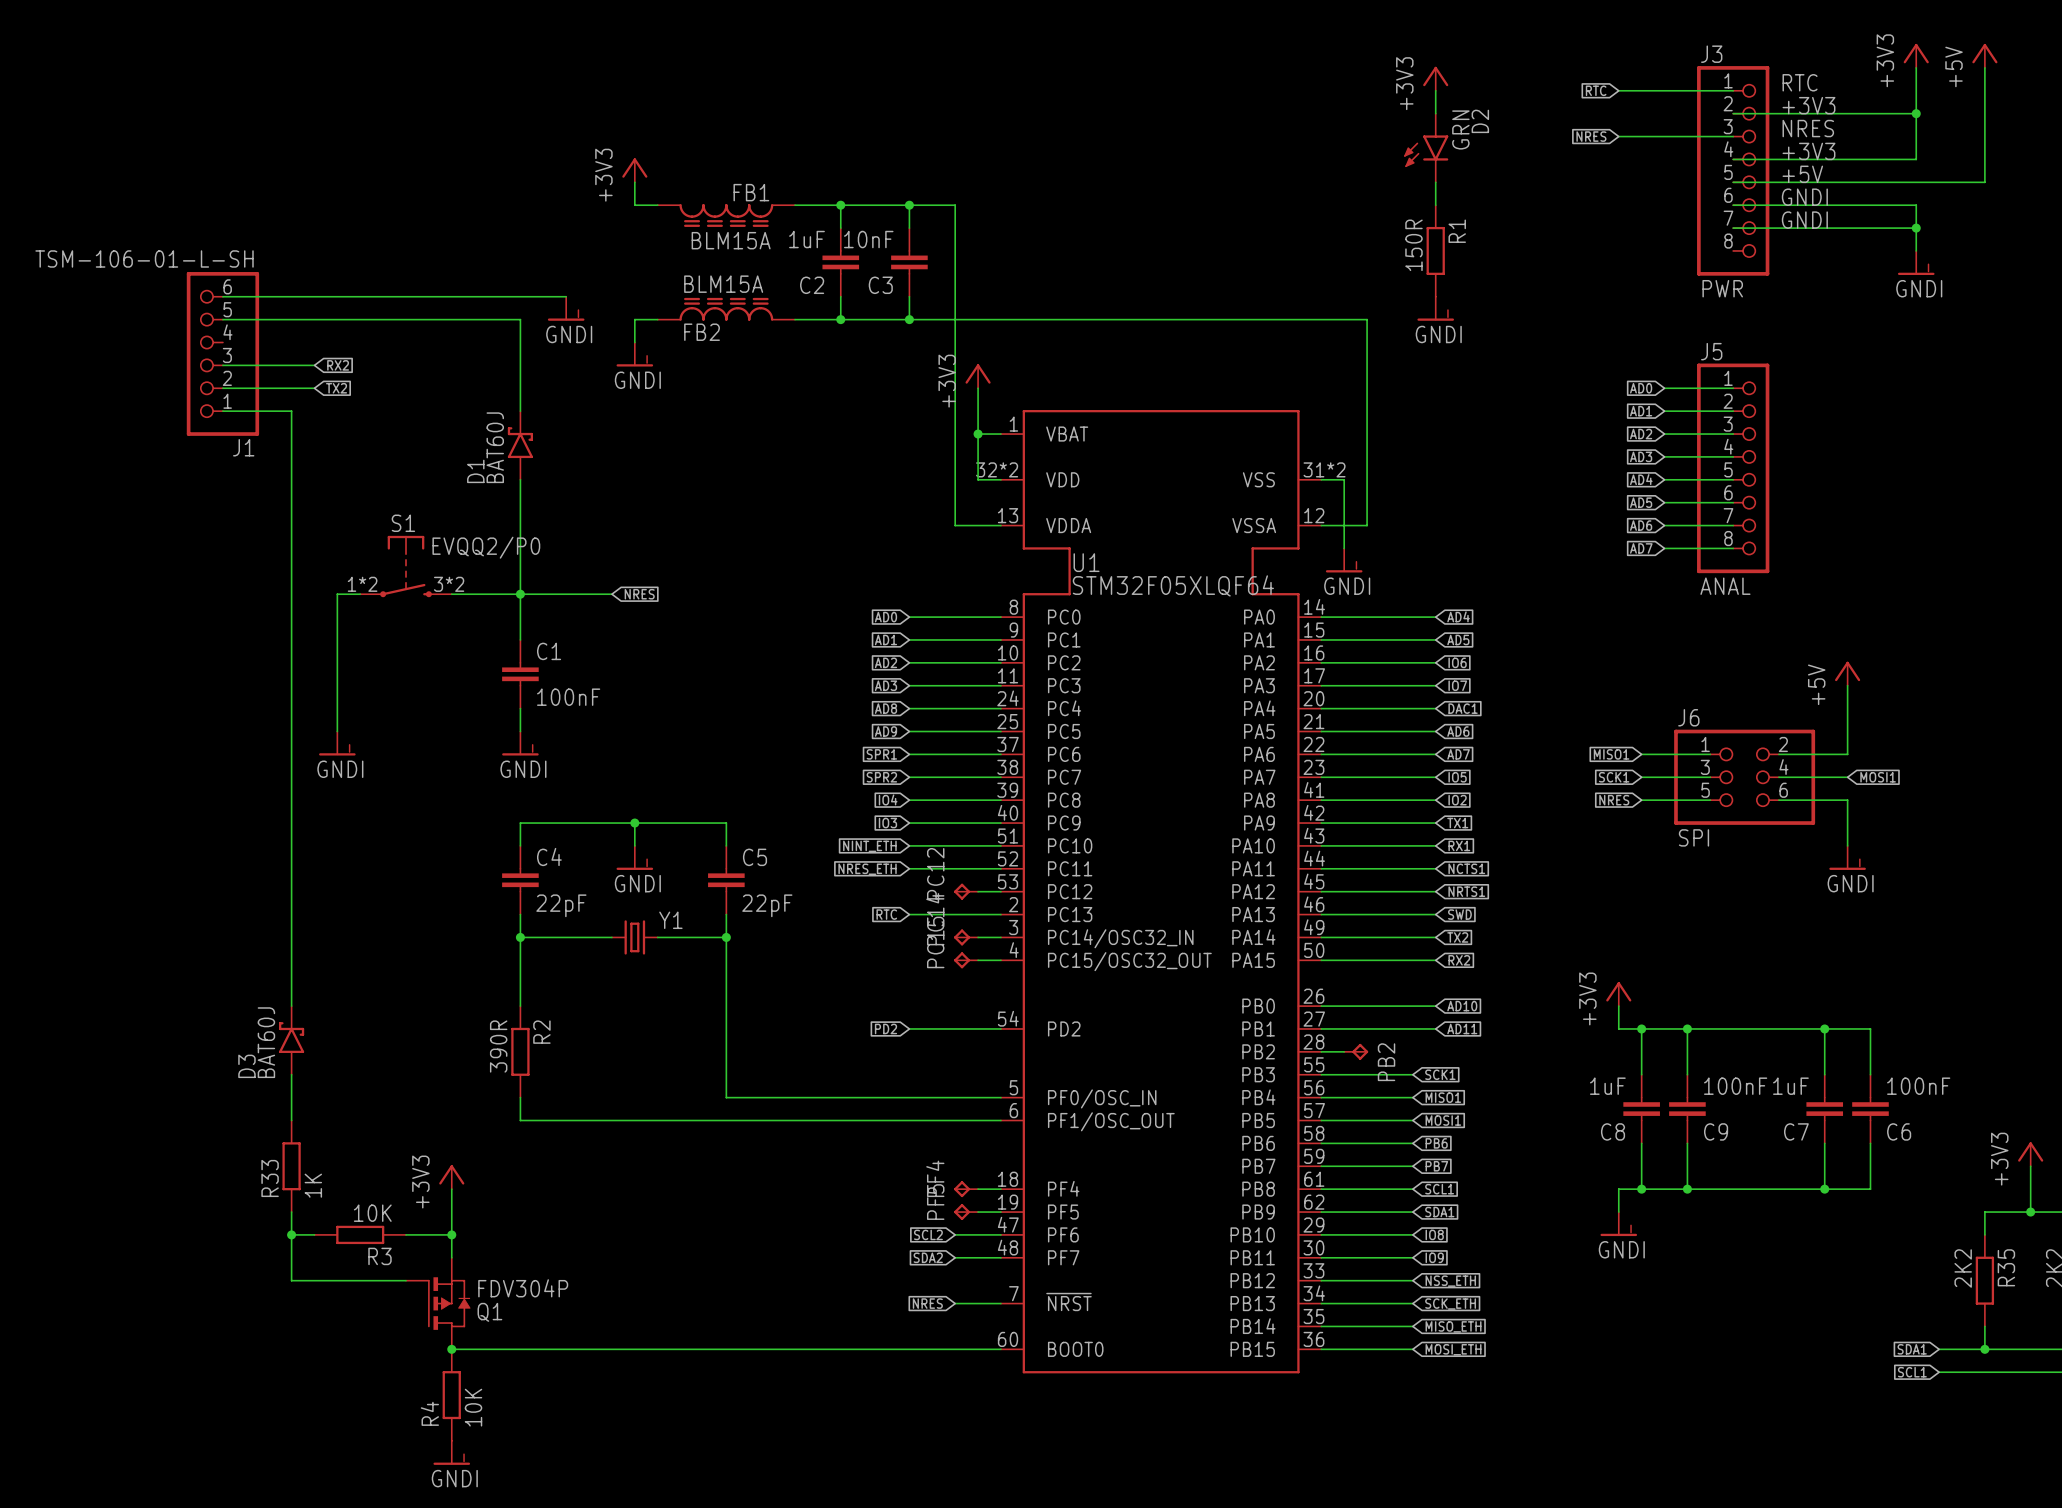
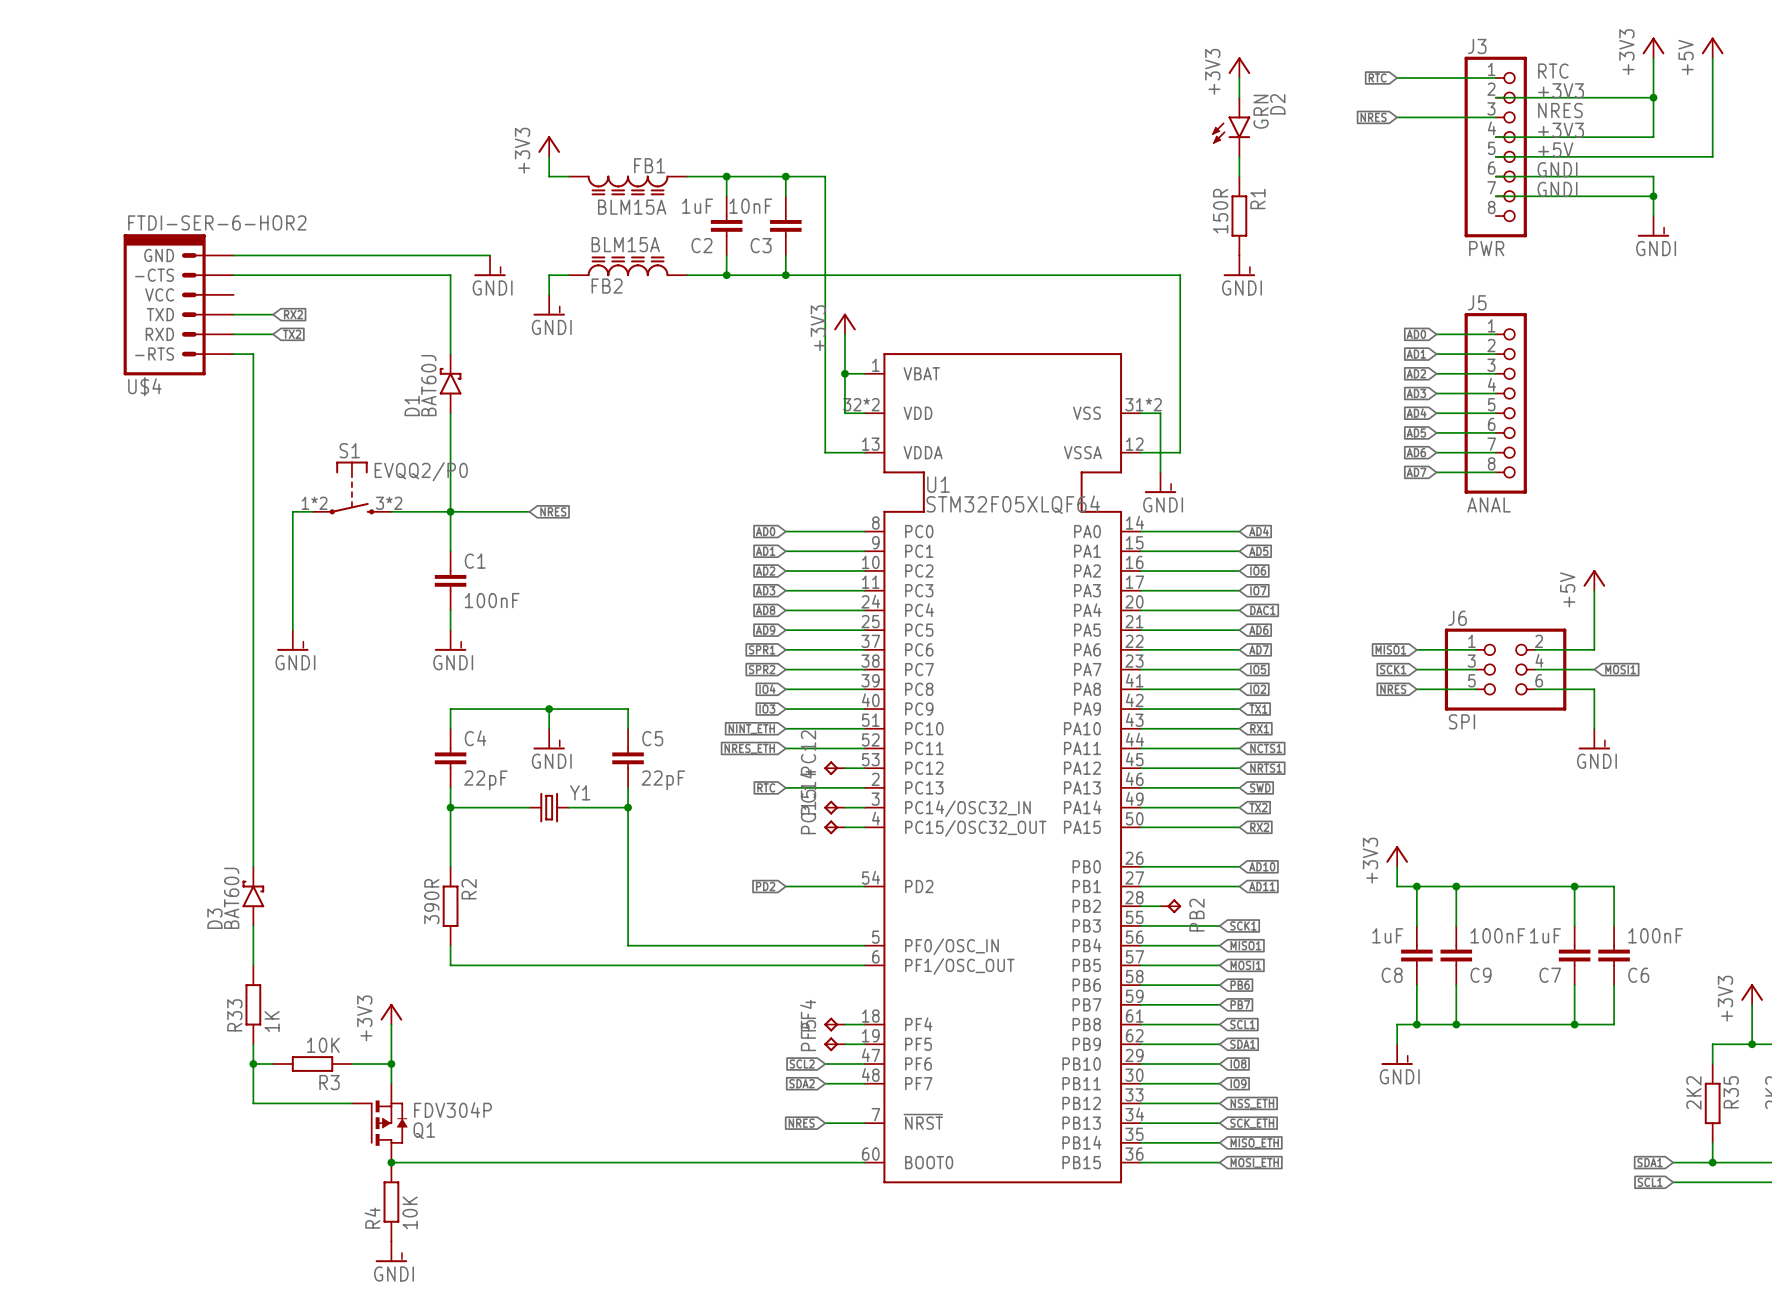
U$4: none -> FTDI-SER-6-HOR2 (178, 304)
J1: TSM-106-01-L-SH (222, 353) -> none

